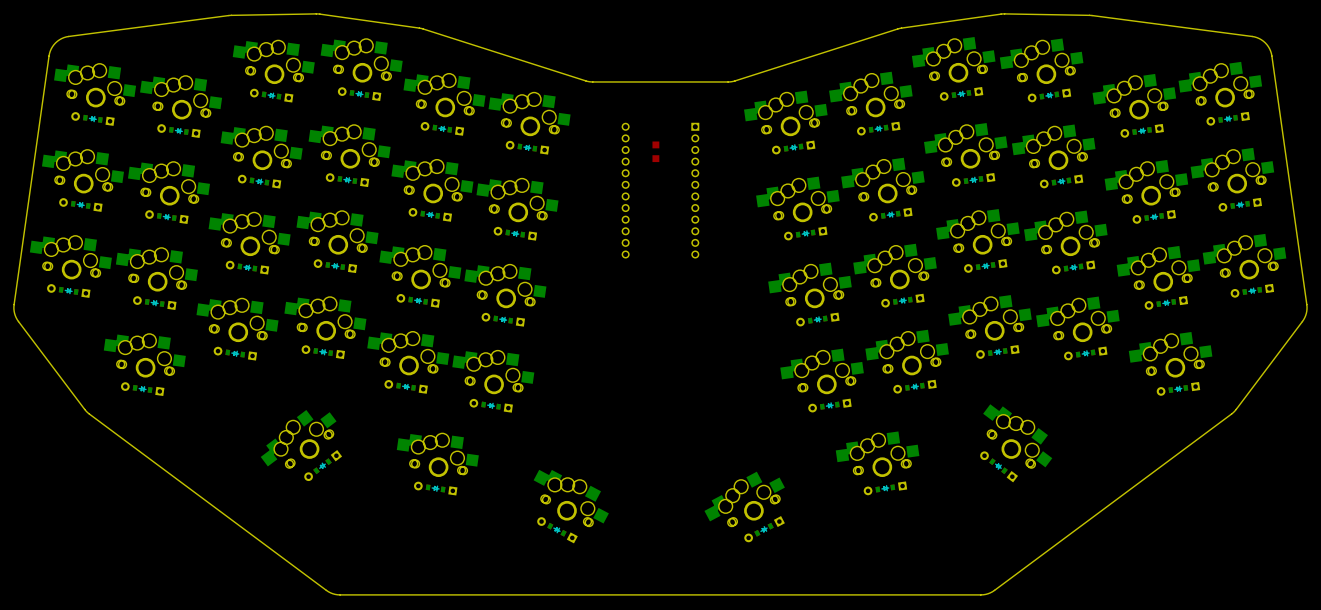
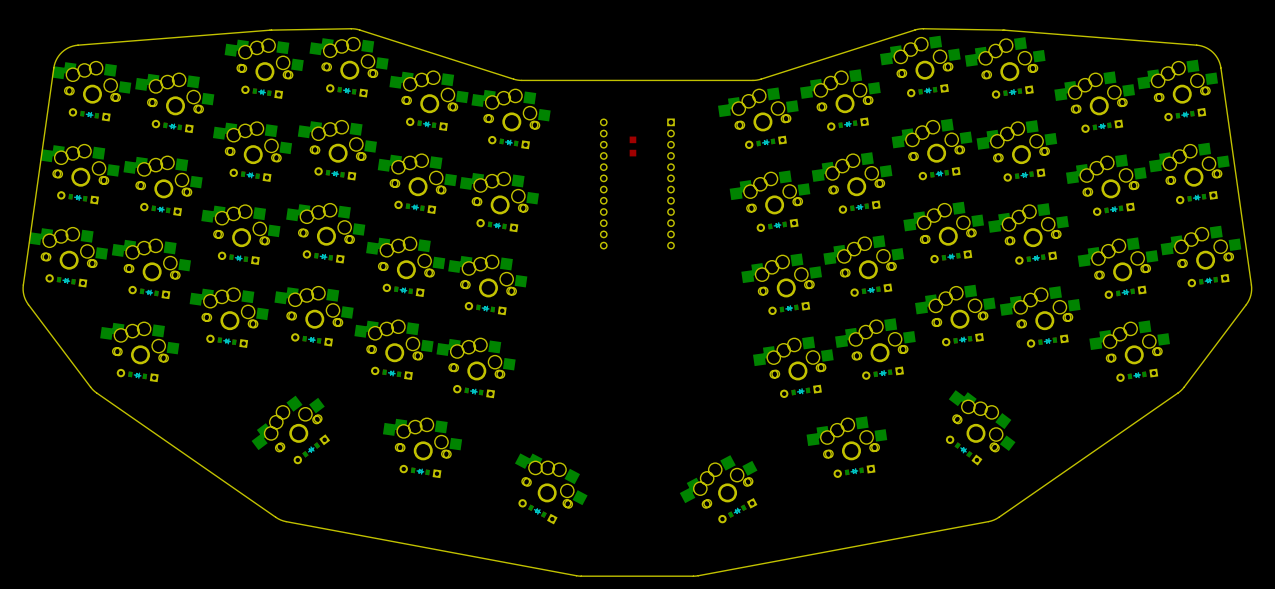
board edge: (1004, 13) (1092, 15) (1252, 36) (1265, 42) (1271, 55) (1307, 309) (1302, 321) (1232, 413) (988, 593) (332, 593) (88, 413) (18, 321) (14, 313) (14, 304) (49, 55) (53, 44) (63, 37) (230, 15) (318, 13) (421, 28) (589, 81) (728, 81) (899, 28) (1004, 13) -> (923, 28) (752, 80) (517, 80) (353, 28) (270, 30) (72, 46) (60, 54) (54, 65) (23, 285) (23, 295) (28, 304) (94, 391) (275, 517) (286, 521) (578, 576) (693, 576) (991, 520) (1181, 390) (1247, 302) (1250, 295) (1251, 285) (1220, 67) (1217, 58) (1210, 50) (1196, 45) (1004, 30) (923, 28)

